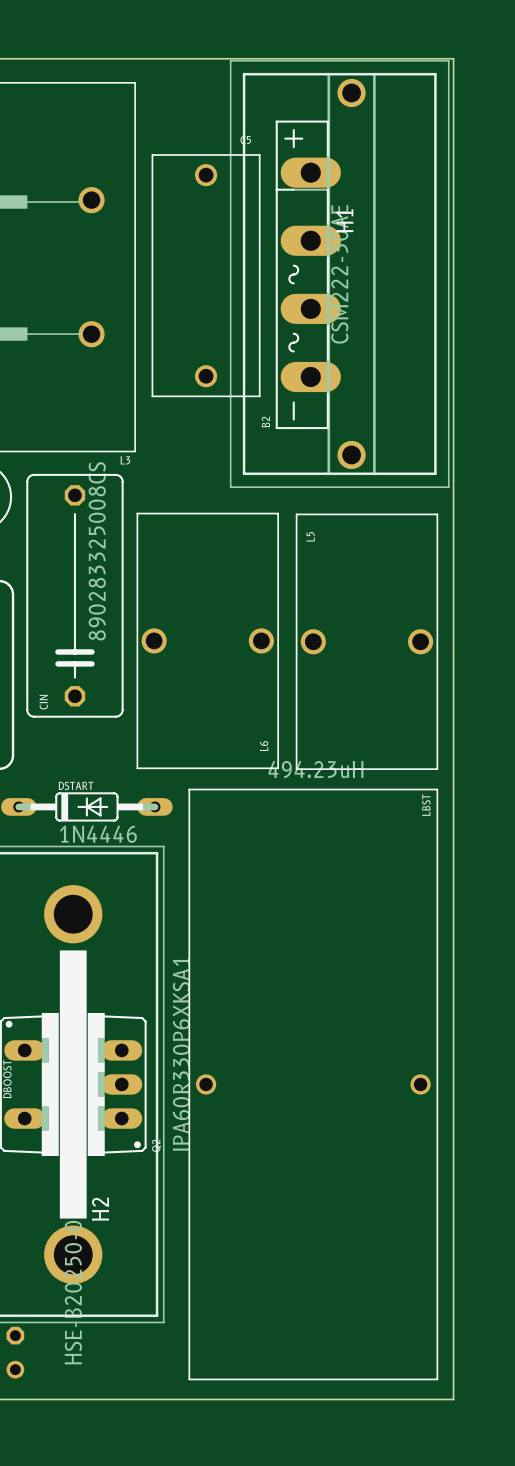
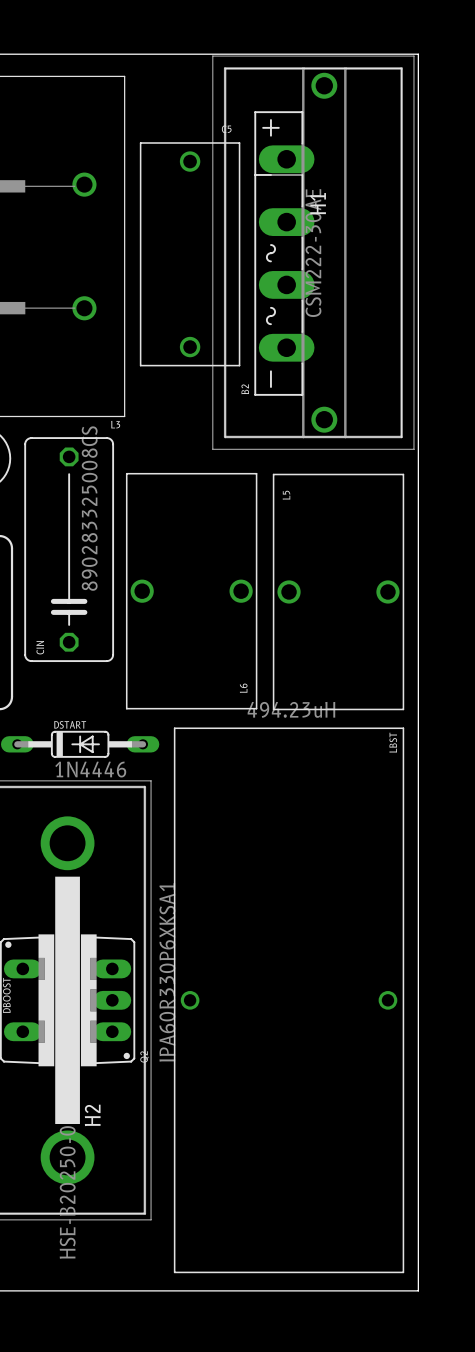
part: (15, 1352) -> none

